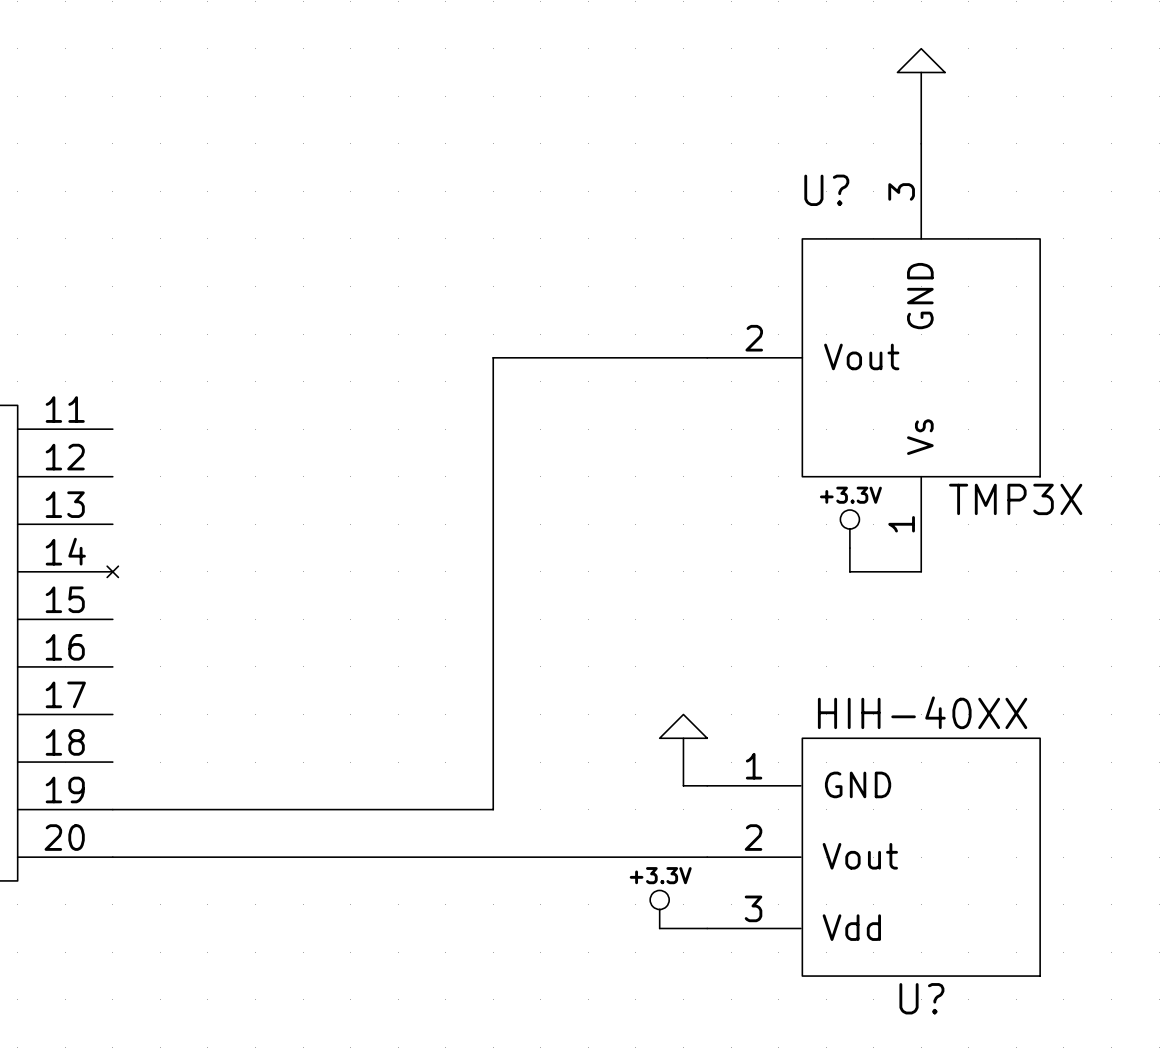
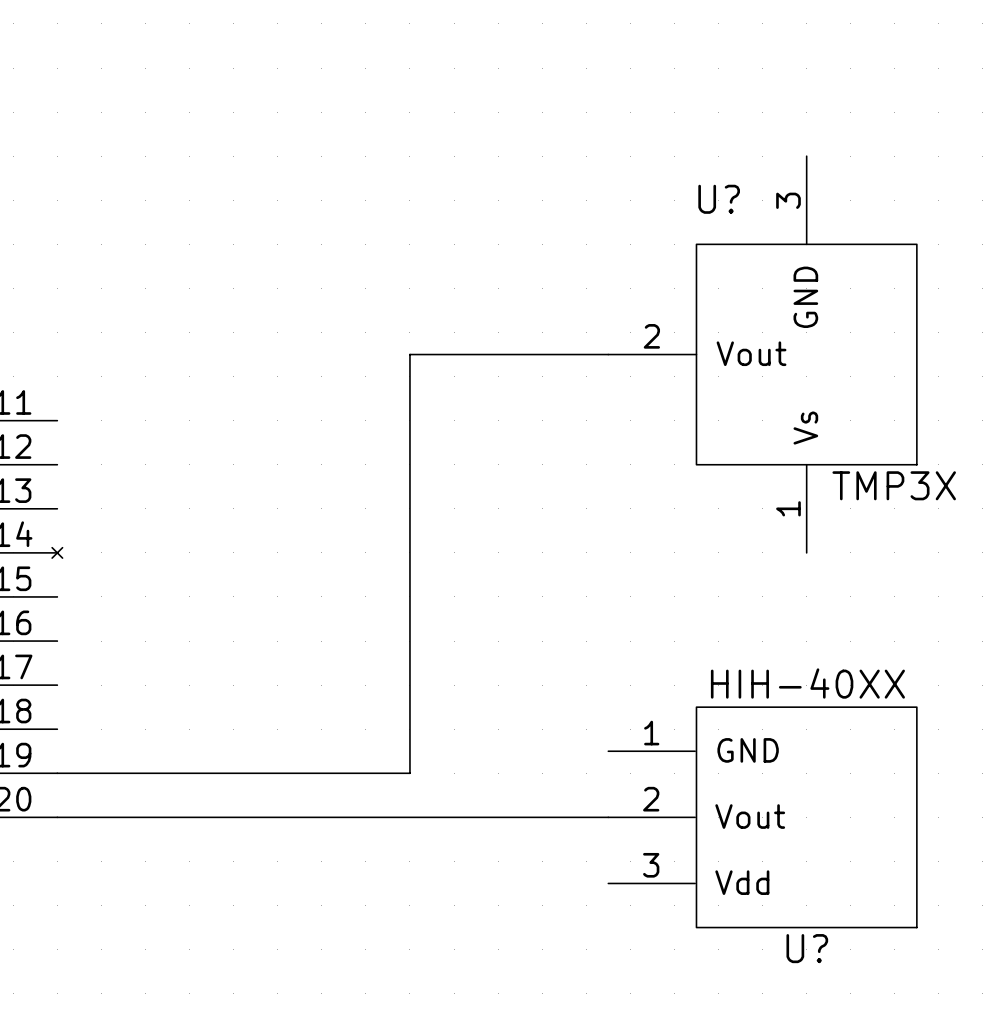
power symbol: (921, 60) -> none
wire: (921, 72) (921, 143) -> none
power symbol: +3.3V (849, 529) -> none
wire: (849, 548) (849, 571) (921, 571) -> none
power symbol: (683, 726) -> none
wire: (683, 738) (683, 785) (707, 785) -> none
power symbol: +3.3V (659, 909) -> none
wire: (659, 928) (707, 928) -> none

